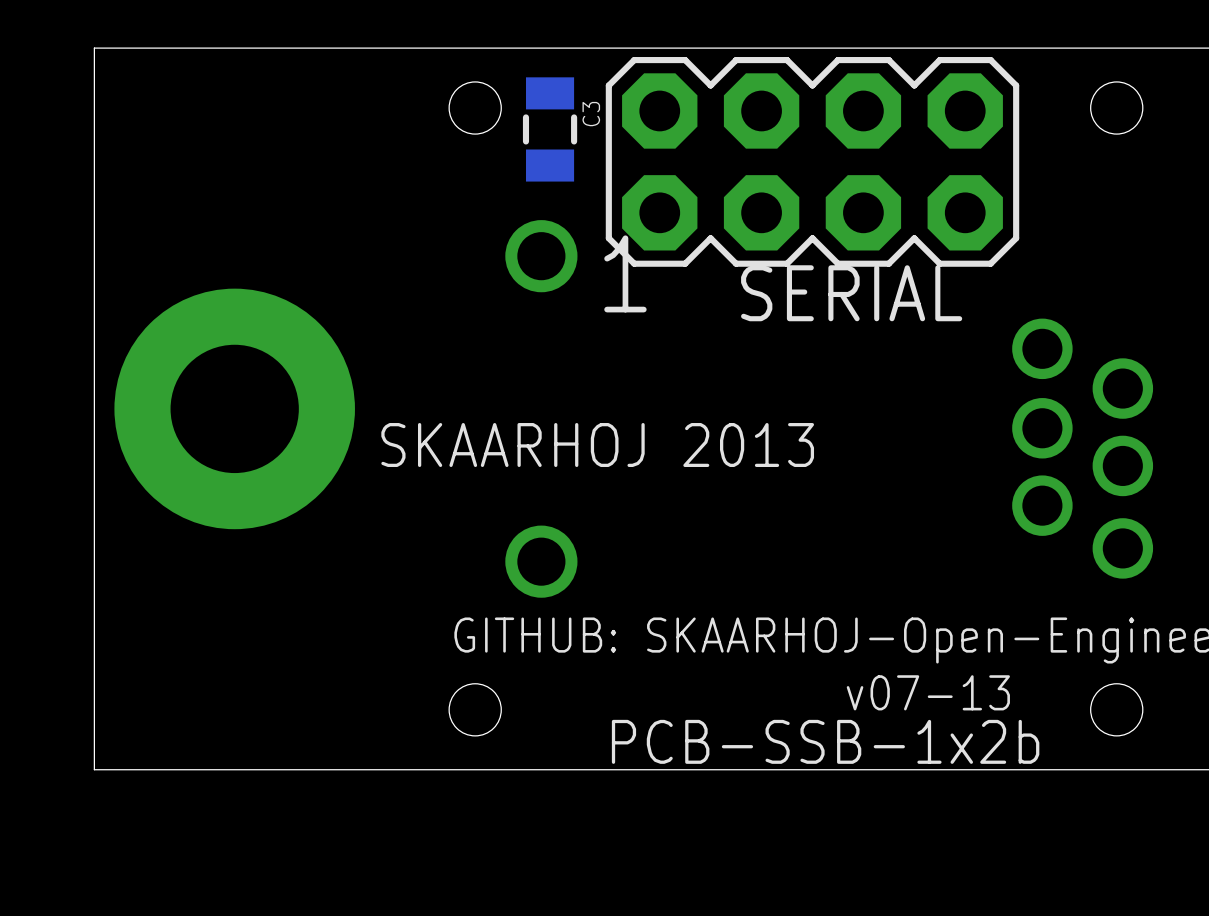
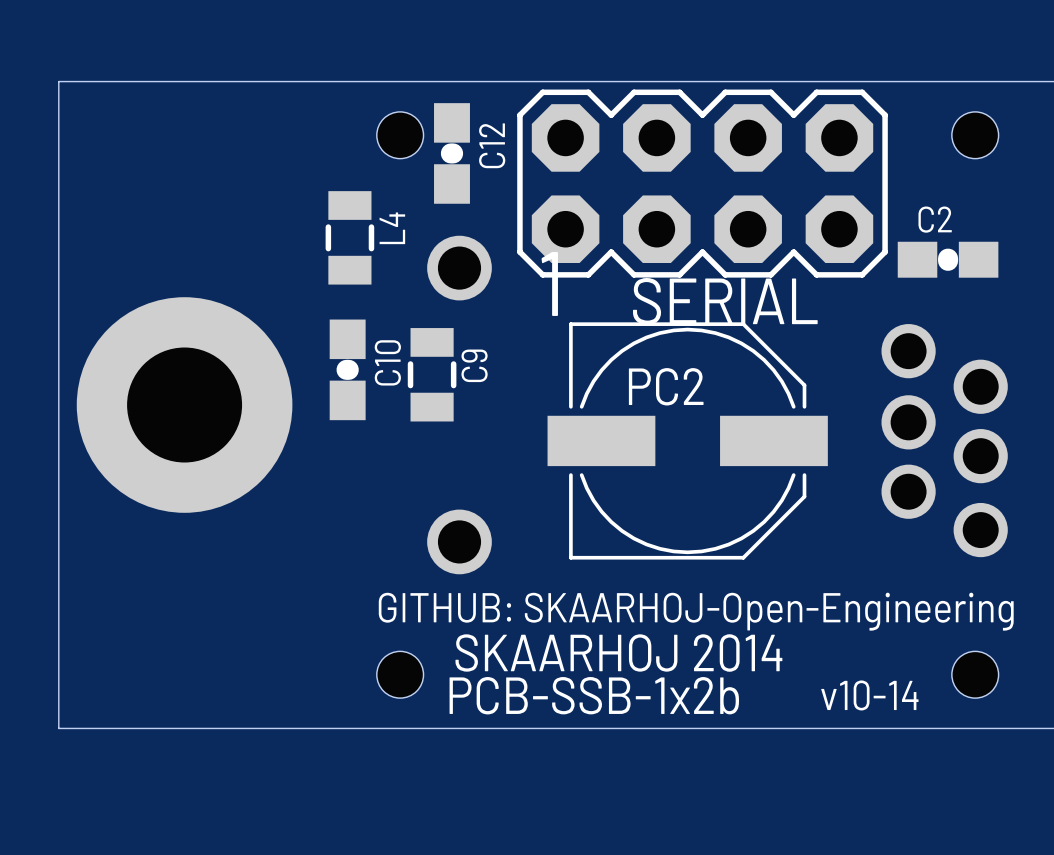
C12: none -> (451, 153)
C3: (550, 129) -> none
L4: none -> (349, 237)
C2: none -> (948, 259)
C10: none -> (347, 369)
C9: none -> (432, 374)
text: SKAARHOJ 2013 (597, 445) -> none
PC2: none -> (687, 440)
text: none -> SKAARHOJ 2014 (618, 653)
text: v07-13 (928, 692) -> v10-14 (869, 695)
text position: PCB-SSB-1x2b (825, 741) -> PCB-SSB-1x2b (594, 695)

